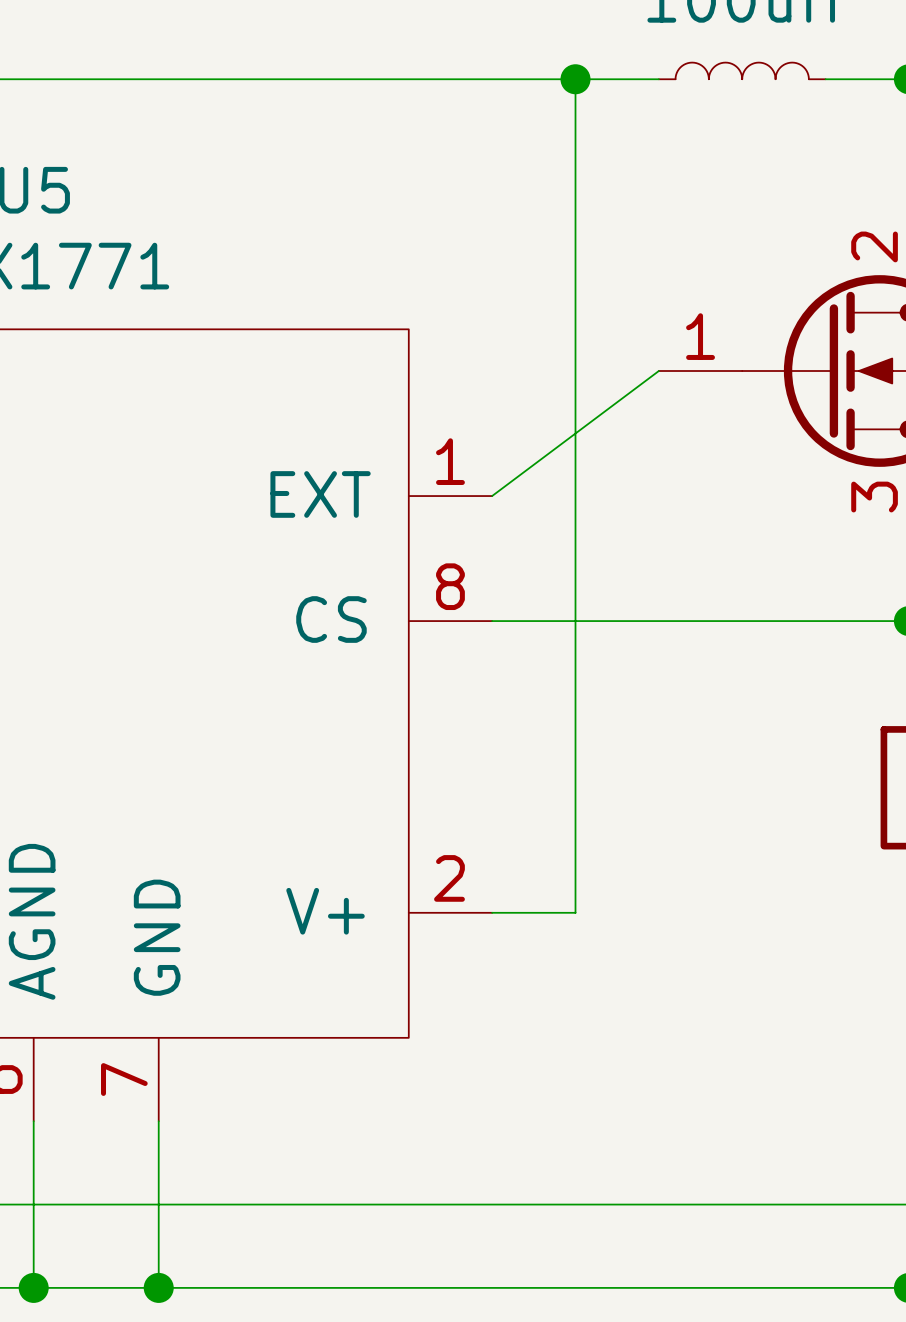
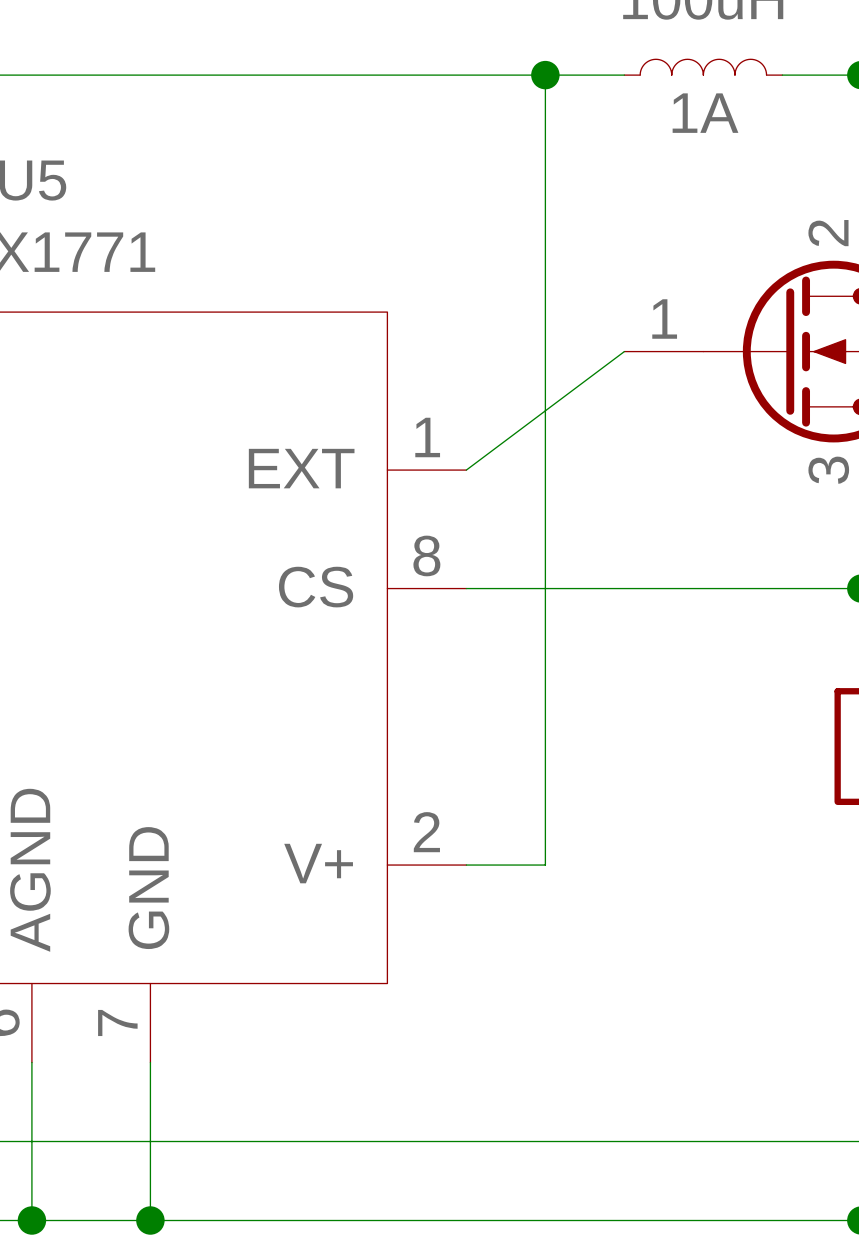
part text: none -> 1A (705, 113)

